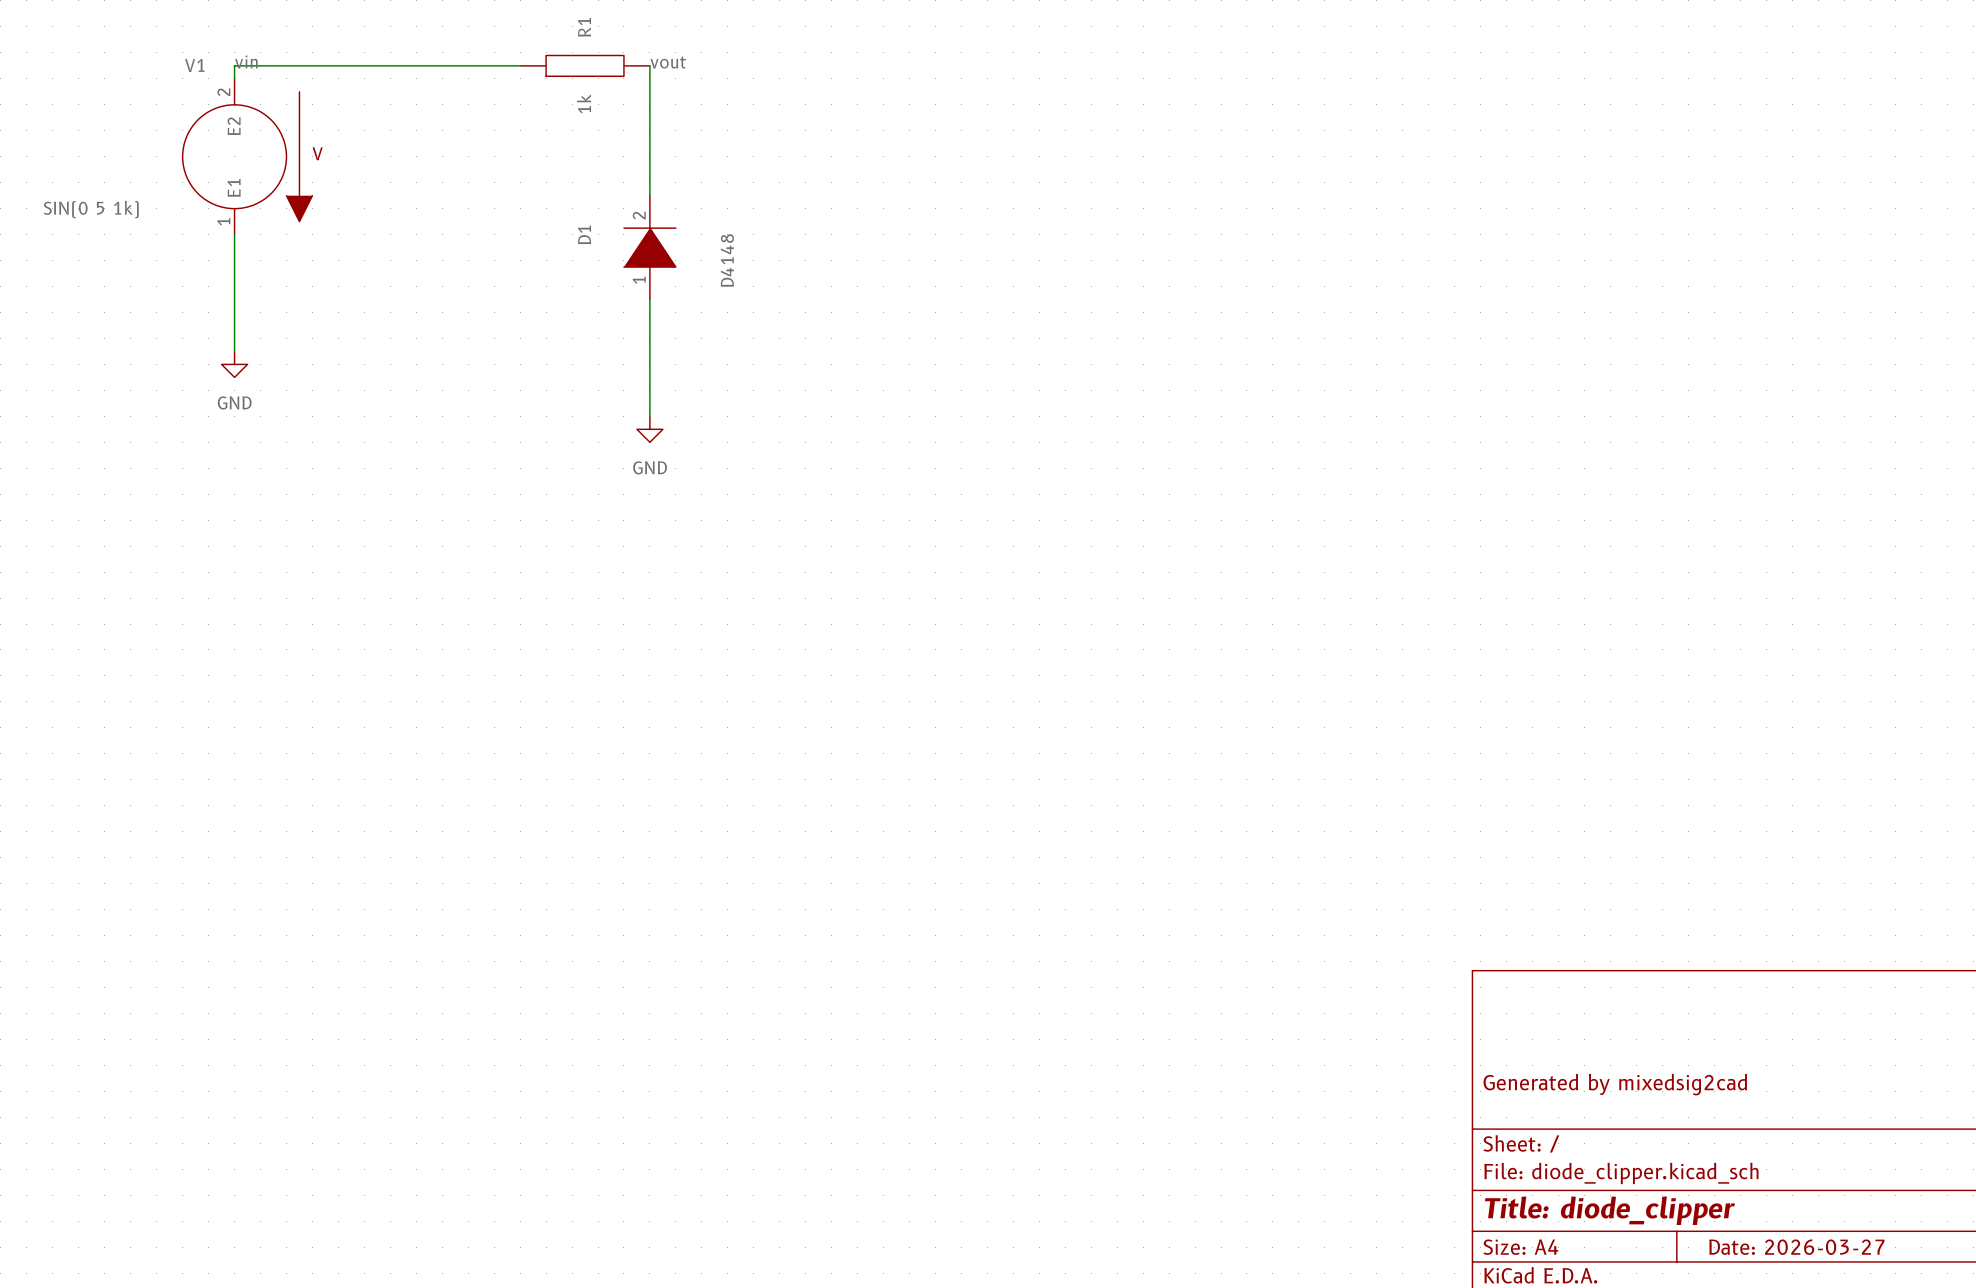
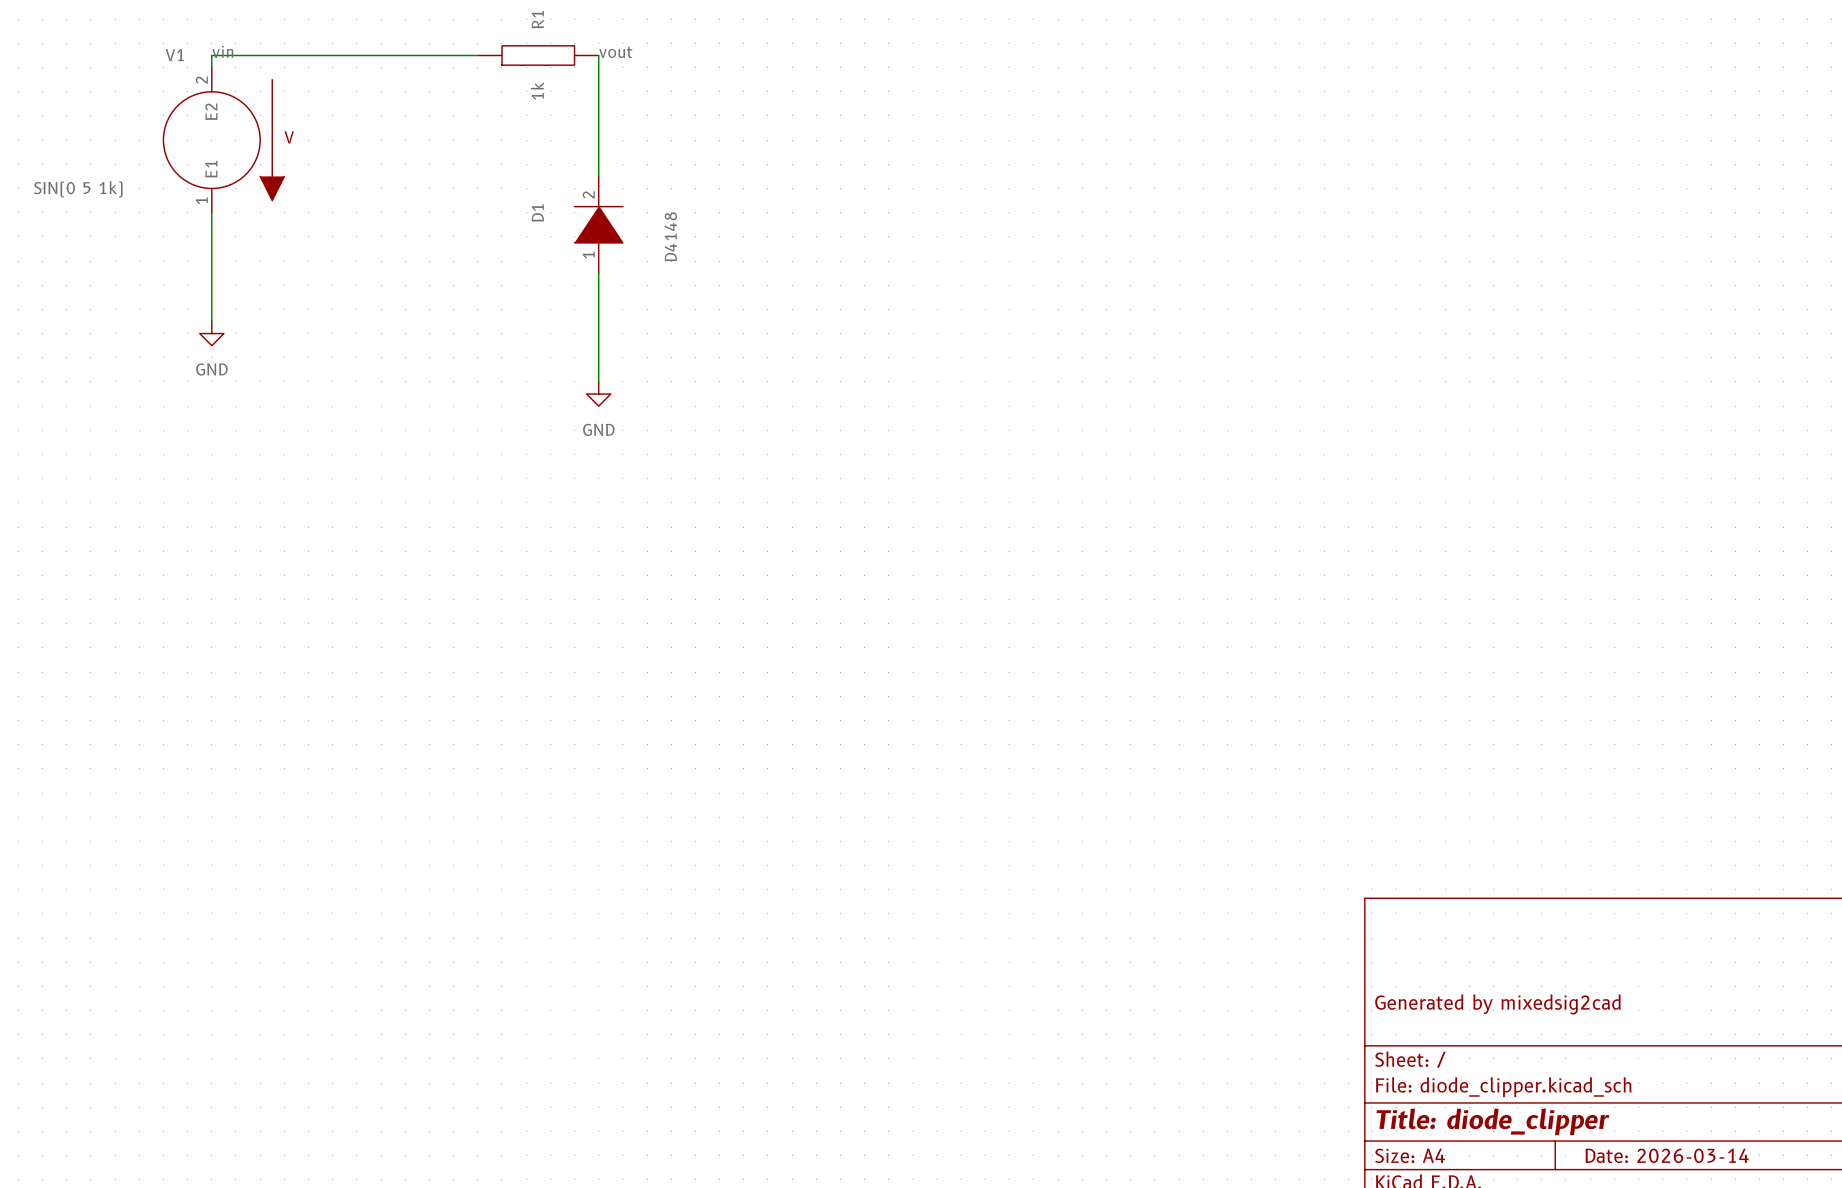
title block: Date: 2026-03-27 (1796, 1247) -> Date: 2026-03-14 (1667, 1155)

